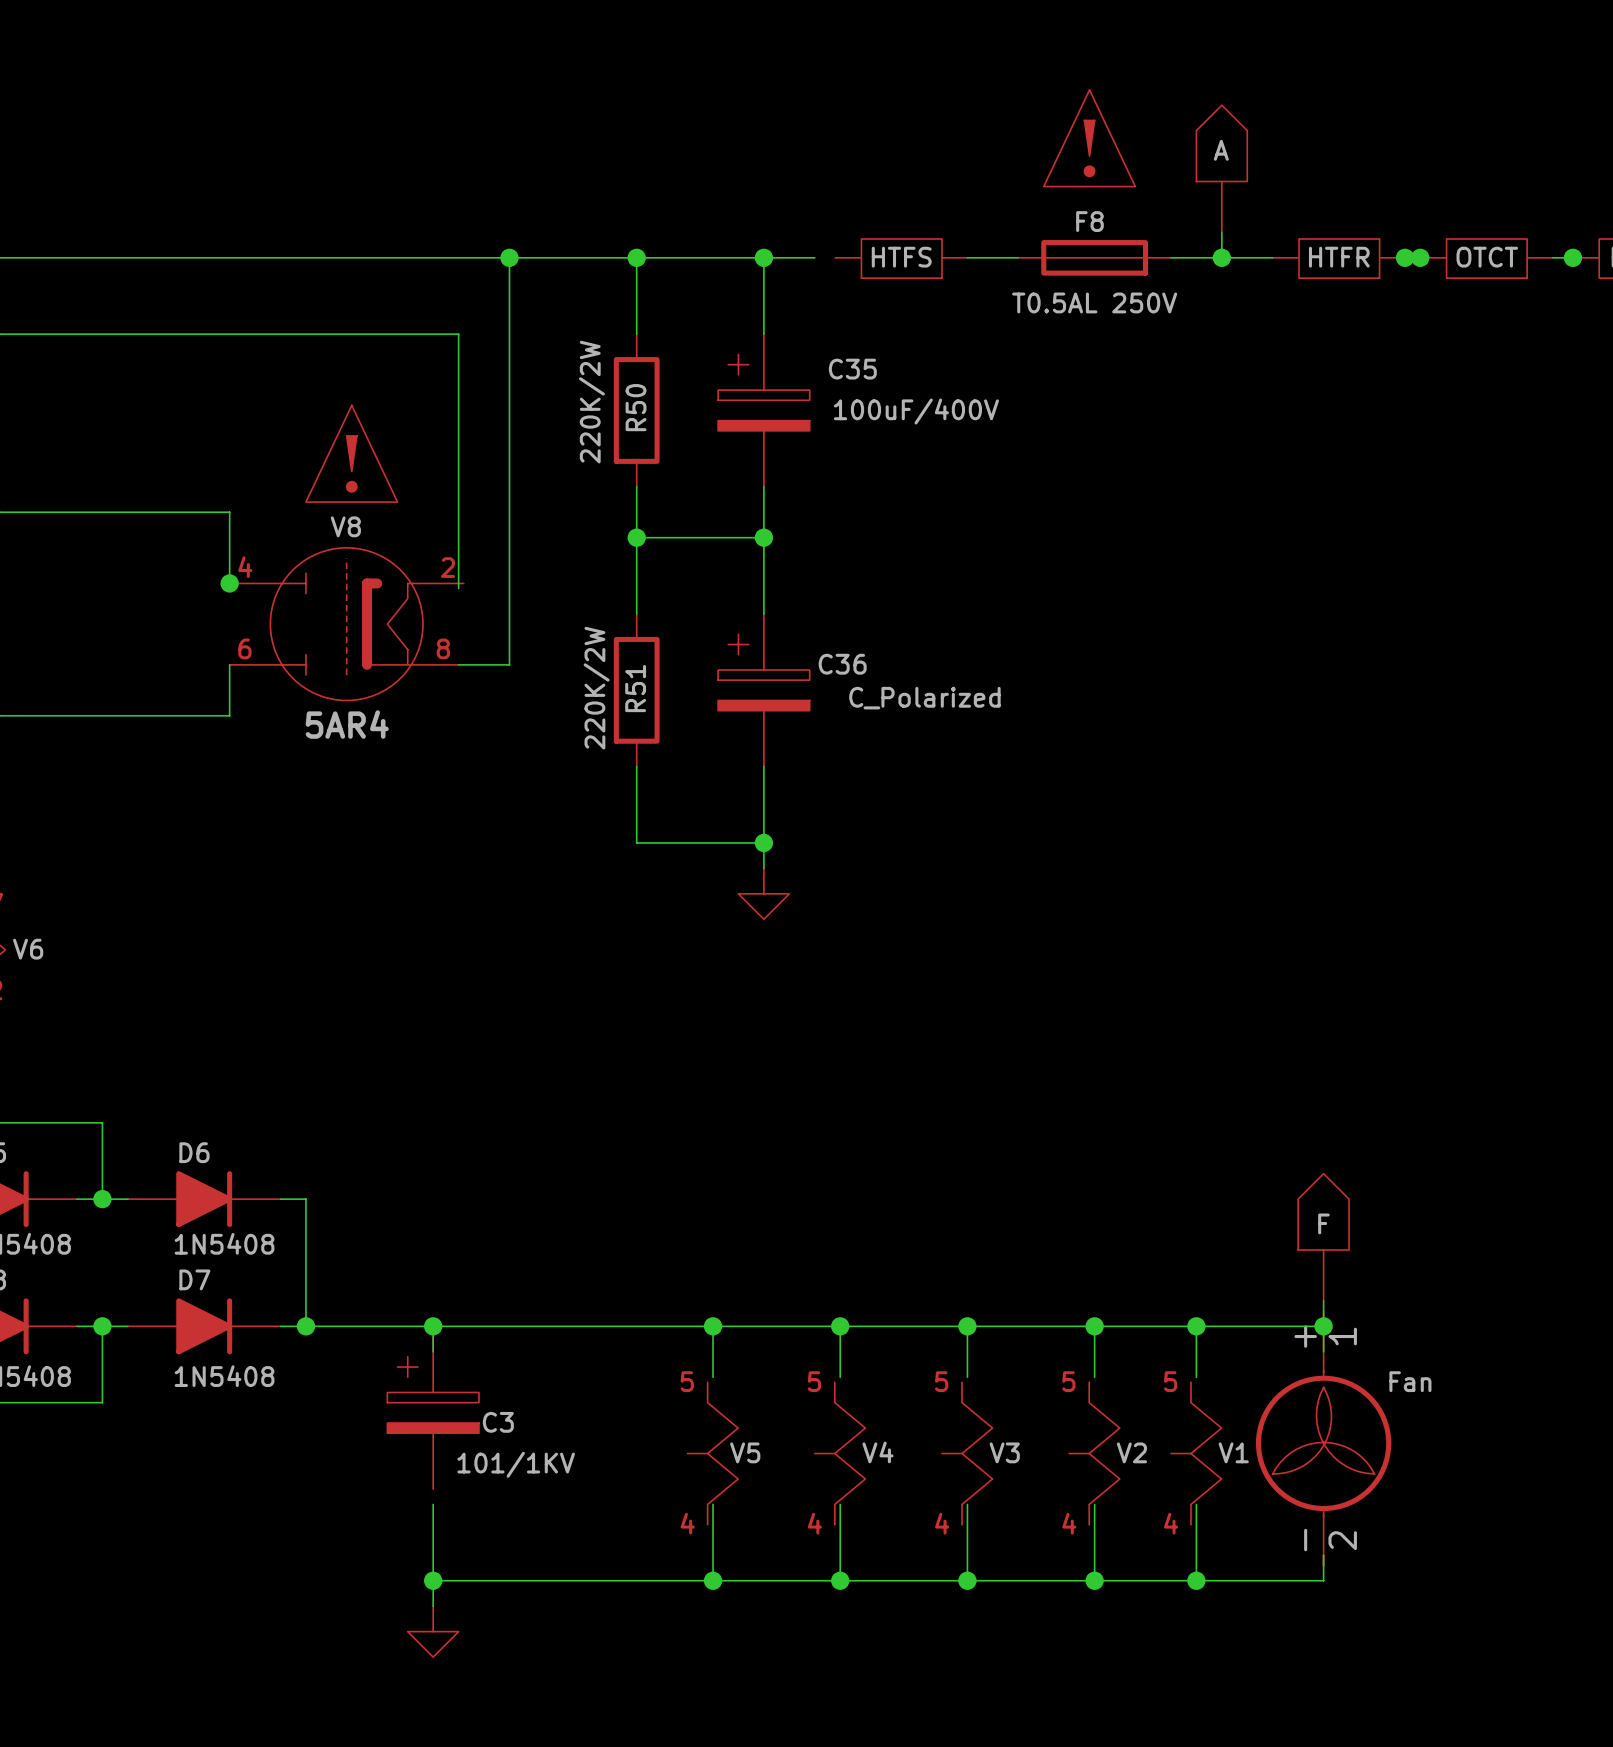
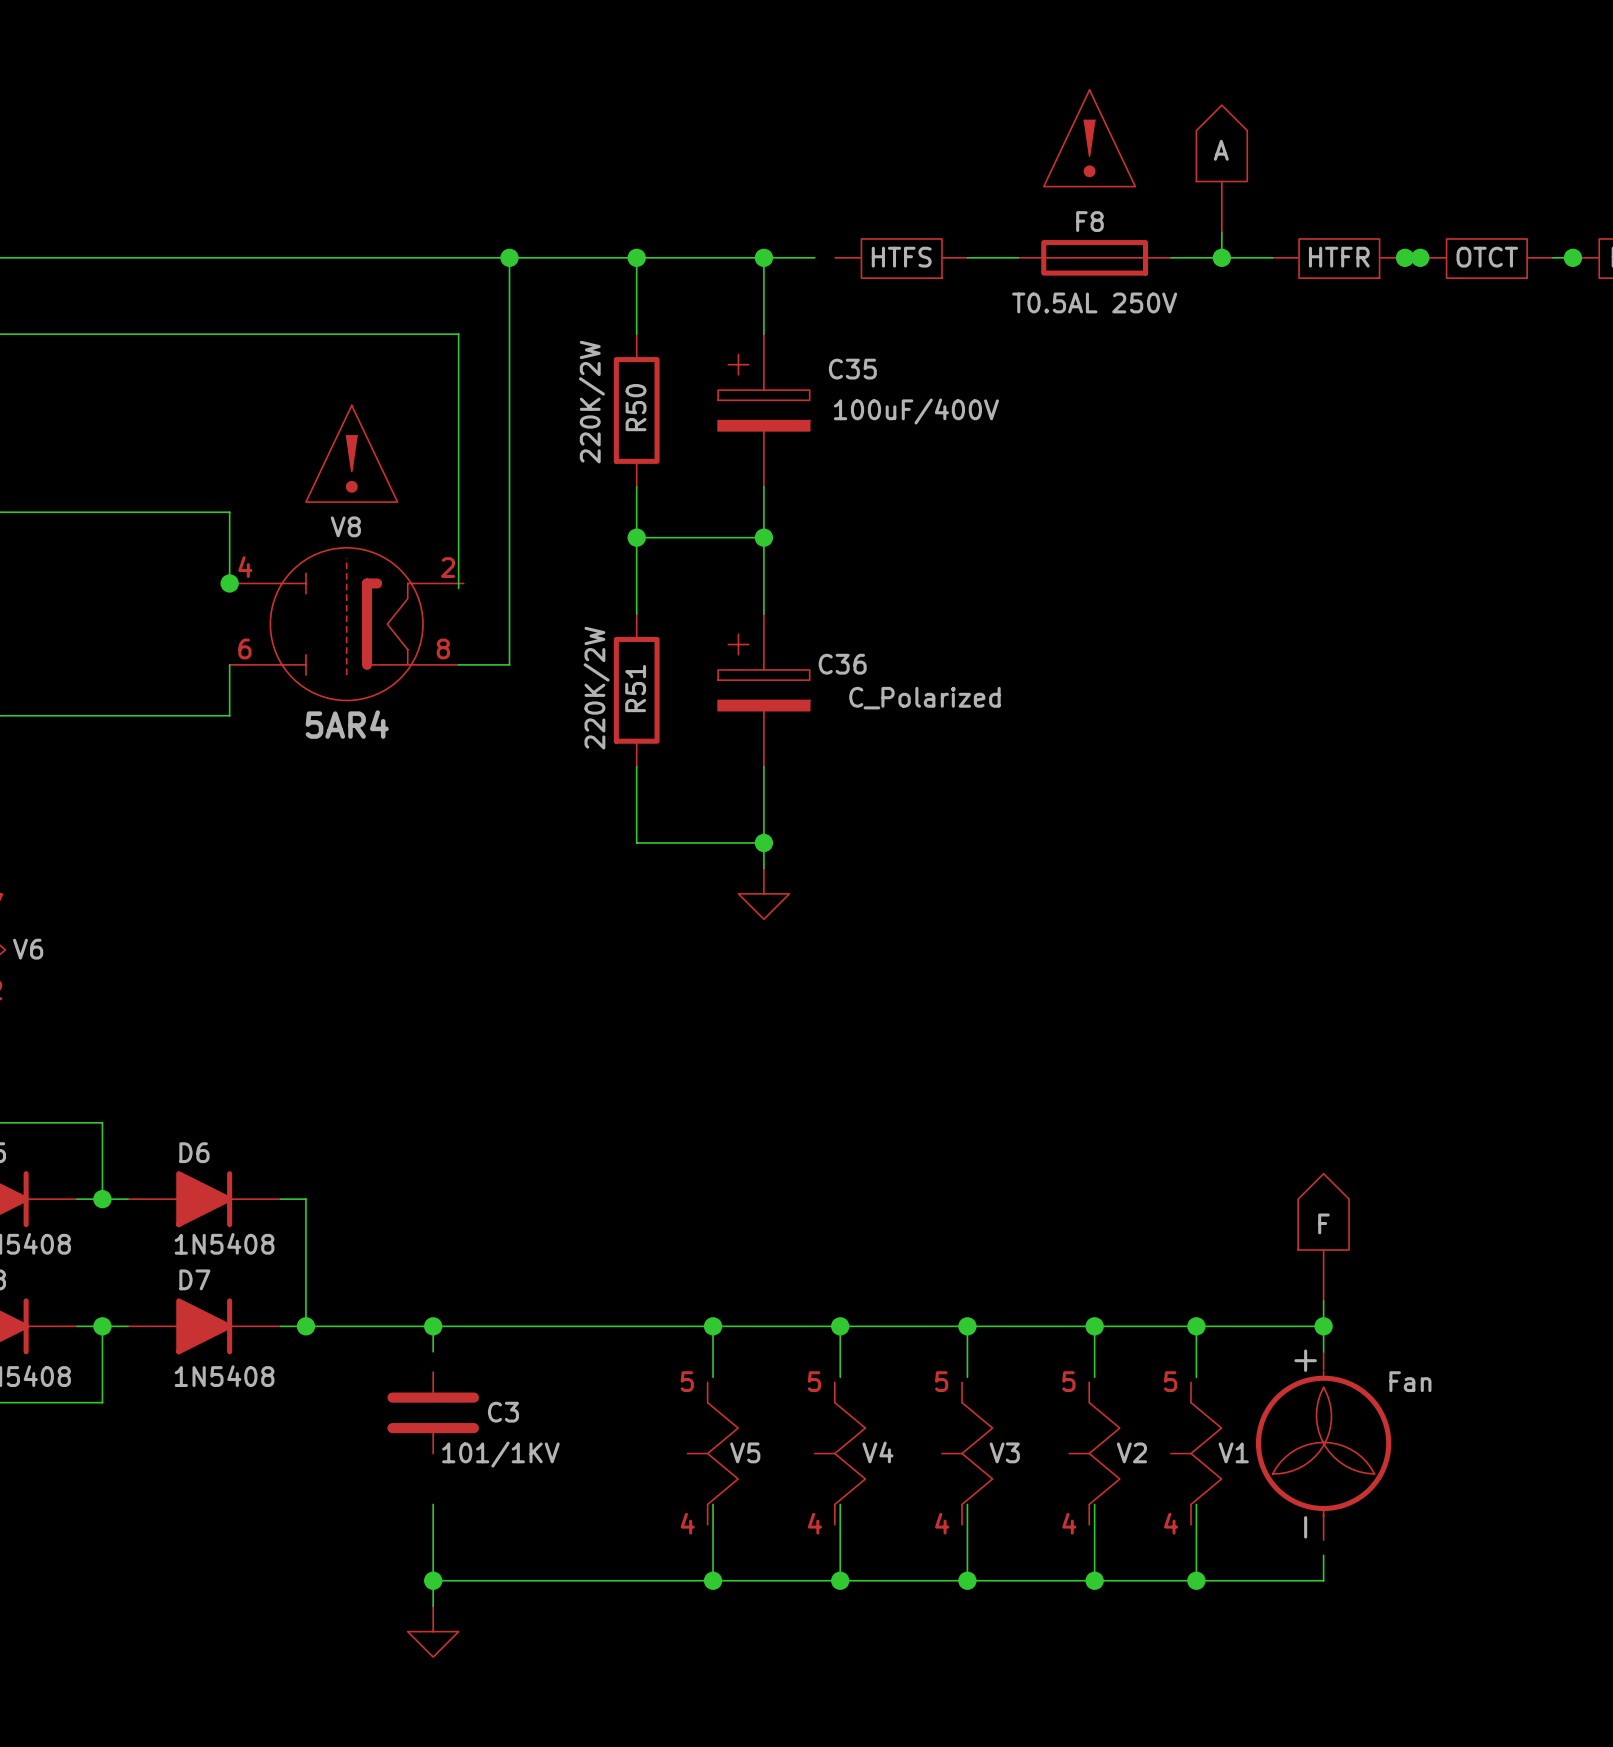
part symbol: [1255, 1311, 1392, 1566] -> [1255, 1351, 1392, 1541]
C3 symbol: [387, 1336, 479, 1490] -> [387, 1372, 479, 1454]

